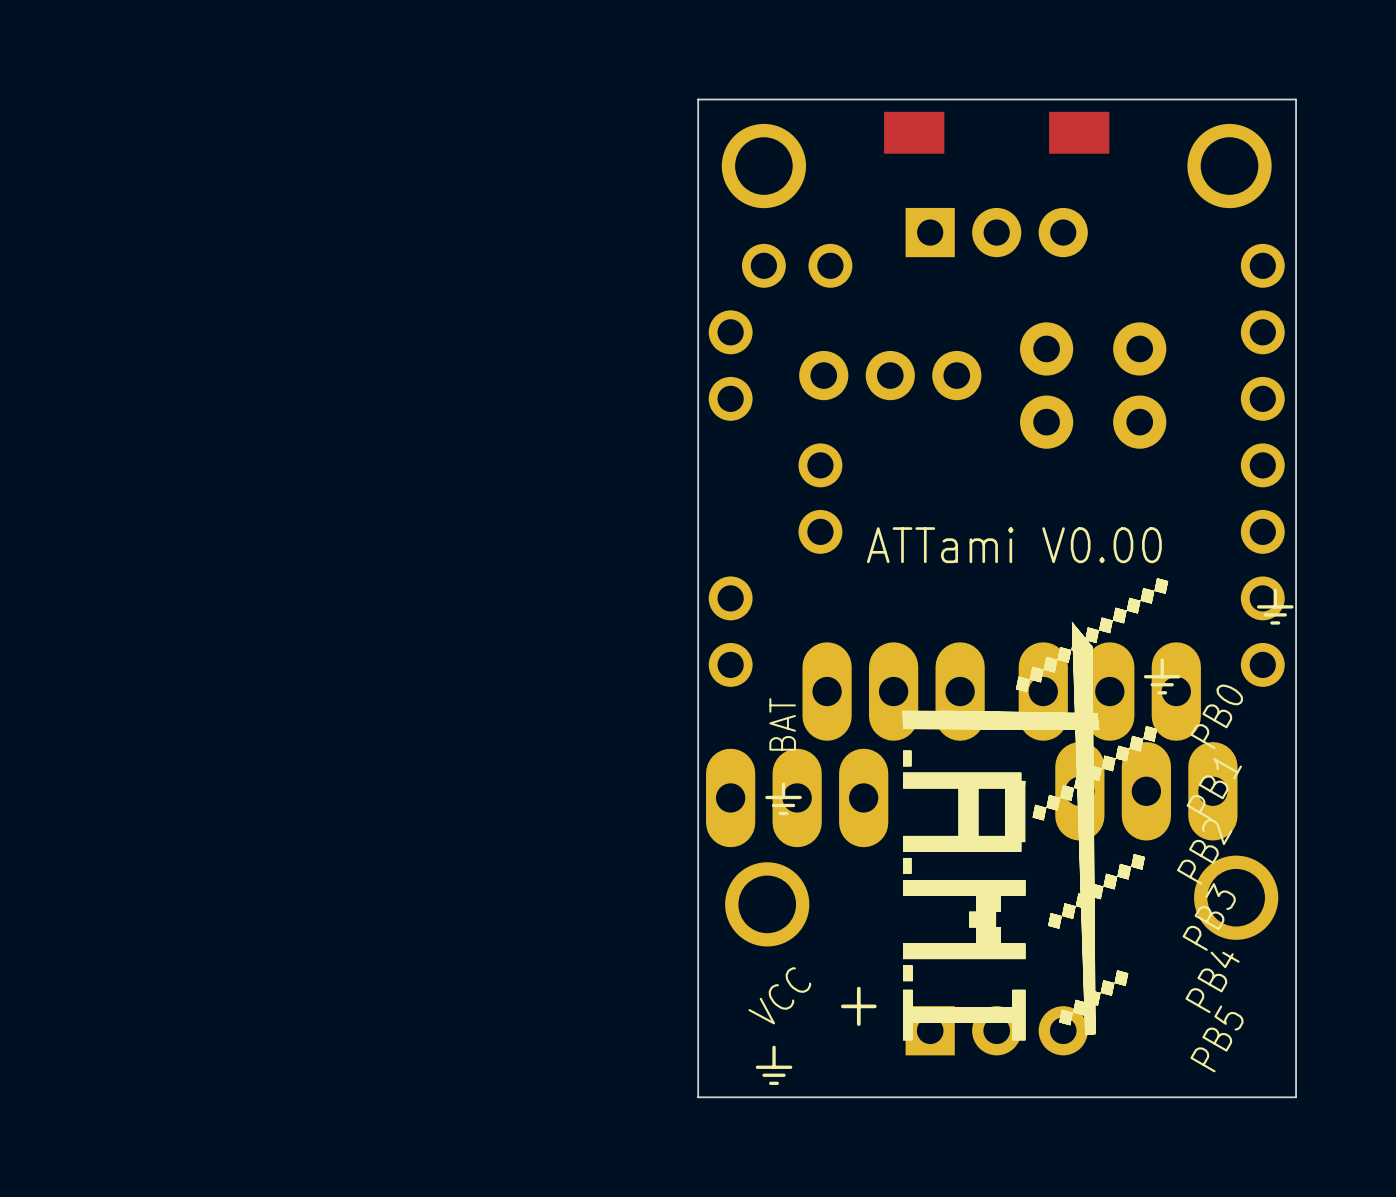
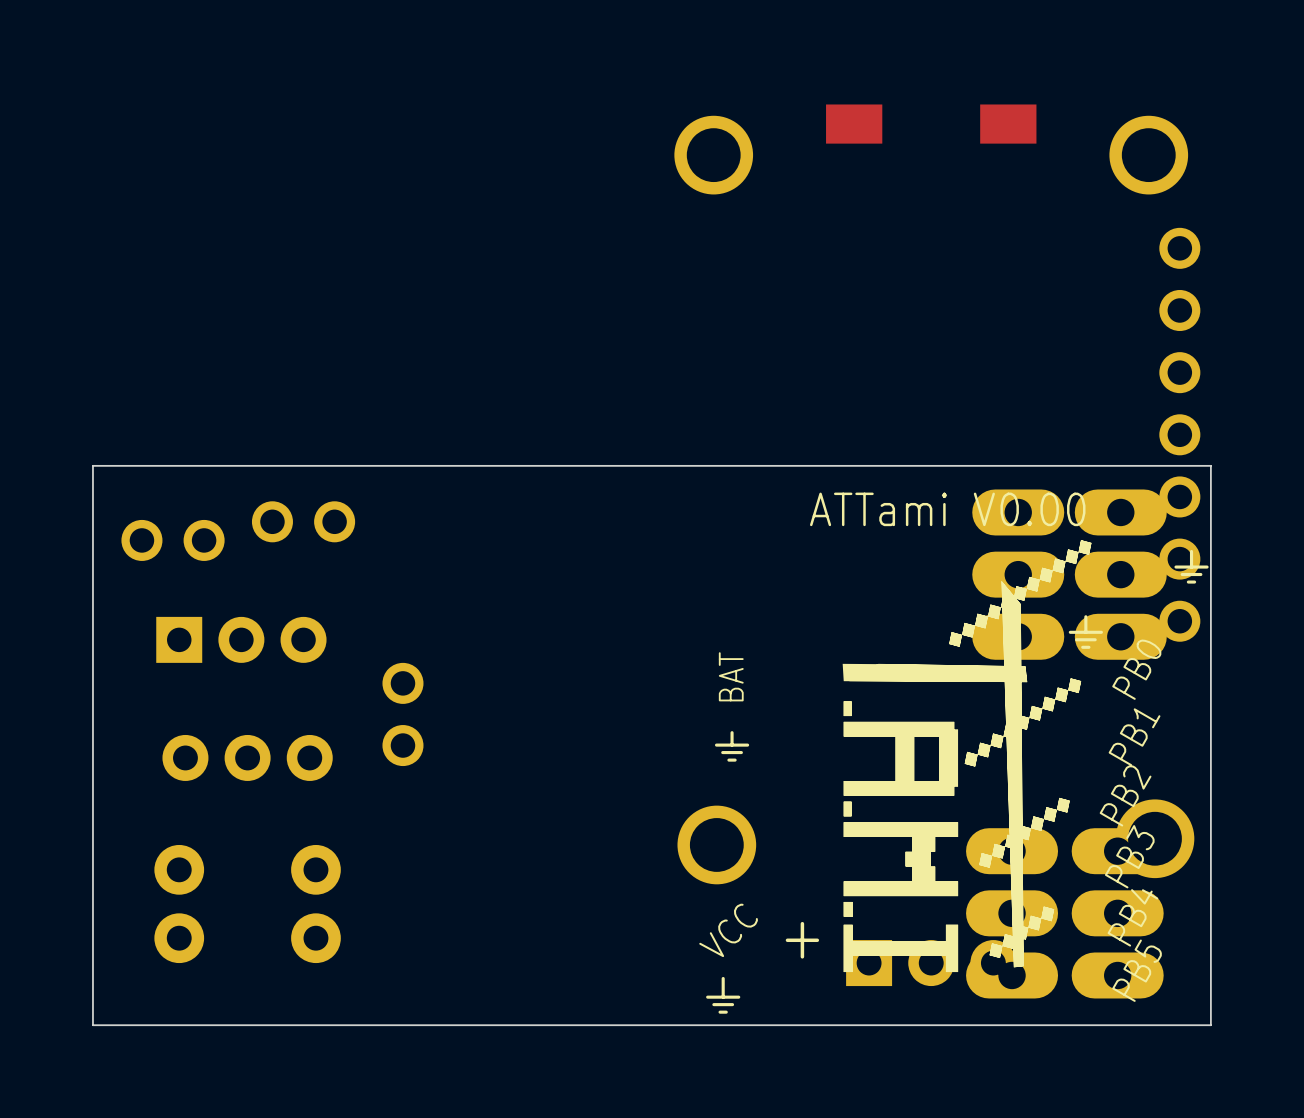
part: (996, 232) -> none
part: (797, 265) -> none
part: (730, 365) -> none
part: (890, 375) -> none
part: (1046, 385) -> none
part: (1139, 385) -> none
part: (820, 498) -> none
board edge: (1296, 498) (1296, 99) (698, 99) (698, 1097) -> (1210, 465) (92, 465) (92, 1025) (652, 1025)
part: none -> (303, 521)
part: none -> (173, 540)
part: none -> (1018, 574)
part: none -> (1120, 574)
part: (730, 631) -> none
part: none -> (241, 639)
part: (893, 691) -> none
part: (1109, 691) -> none
part: none -> (402, 714)
part: (1146, 791) -> none
part: (797, 797) -> none
part: none -> (247, 757)
part: none -> (179, 904)
part: none -> (315, 904)
part: none -> (1012, 913)
part: none -> (1117, 913)

